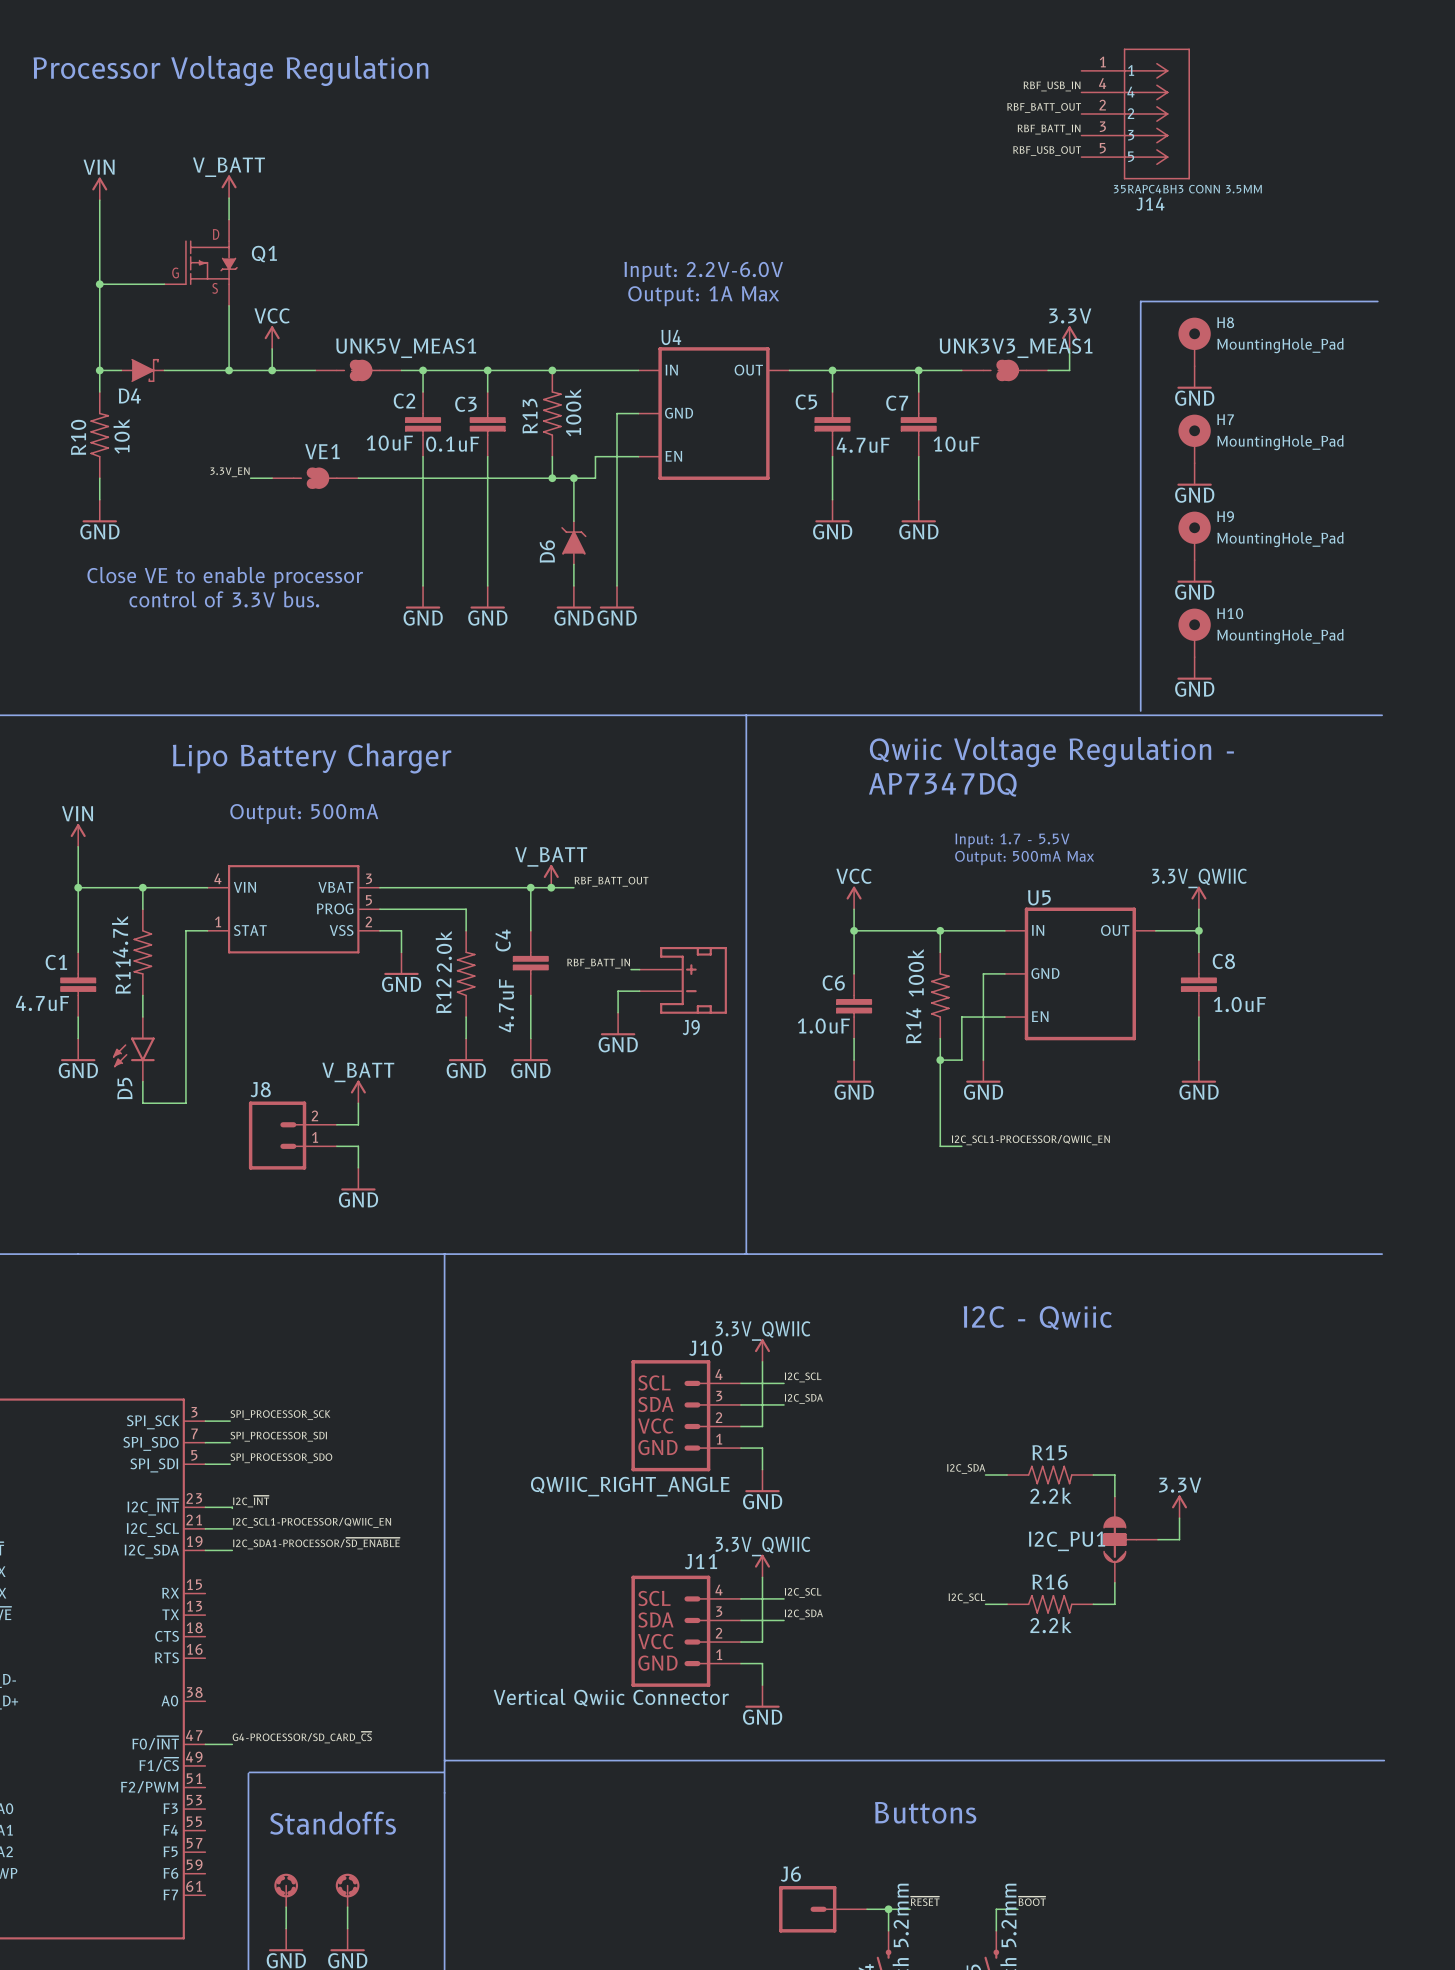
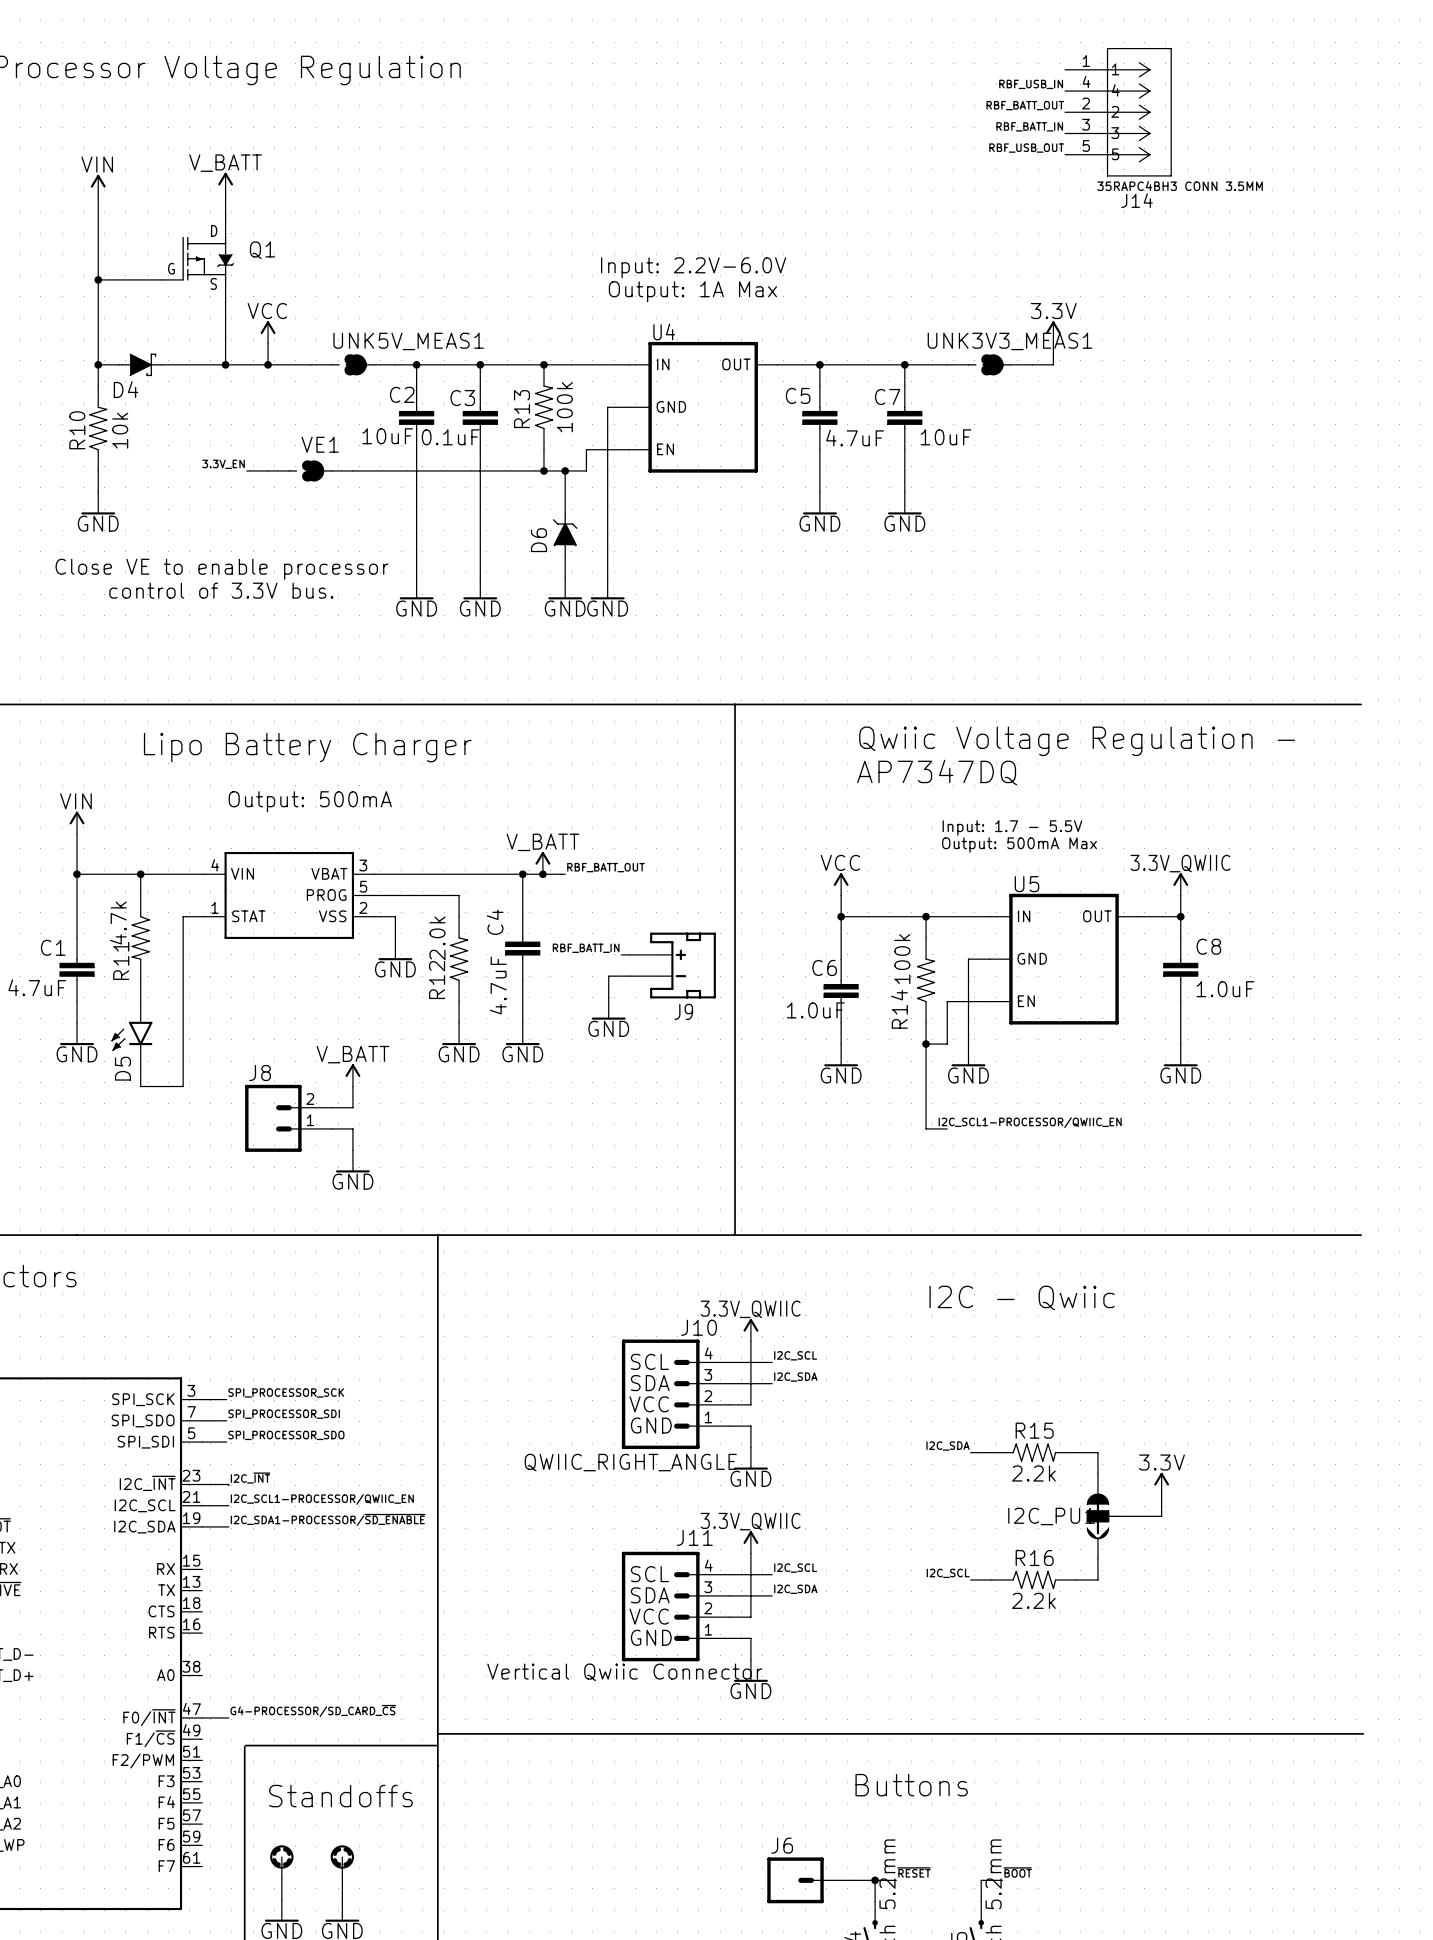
line: (1377, 301) (1140, 301) (1140, 710) -> none
H8: MountingHole_Pad (1194, 341) -> none
power symbol: GND (1194, 377) -> none
H7: MountingHole_Pad (1194, 438) -> none
power symbol: GND (1194, 474) -> none
H9: MountingHole_Pad (1194, 535) -> none
power symbol: GND (1194, 571) -> none
H10: MountingHole_Pad (1194, 632) -> none
power symbol: GND (1194, 668) -> none

